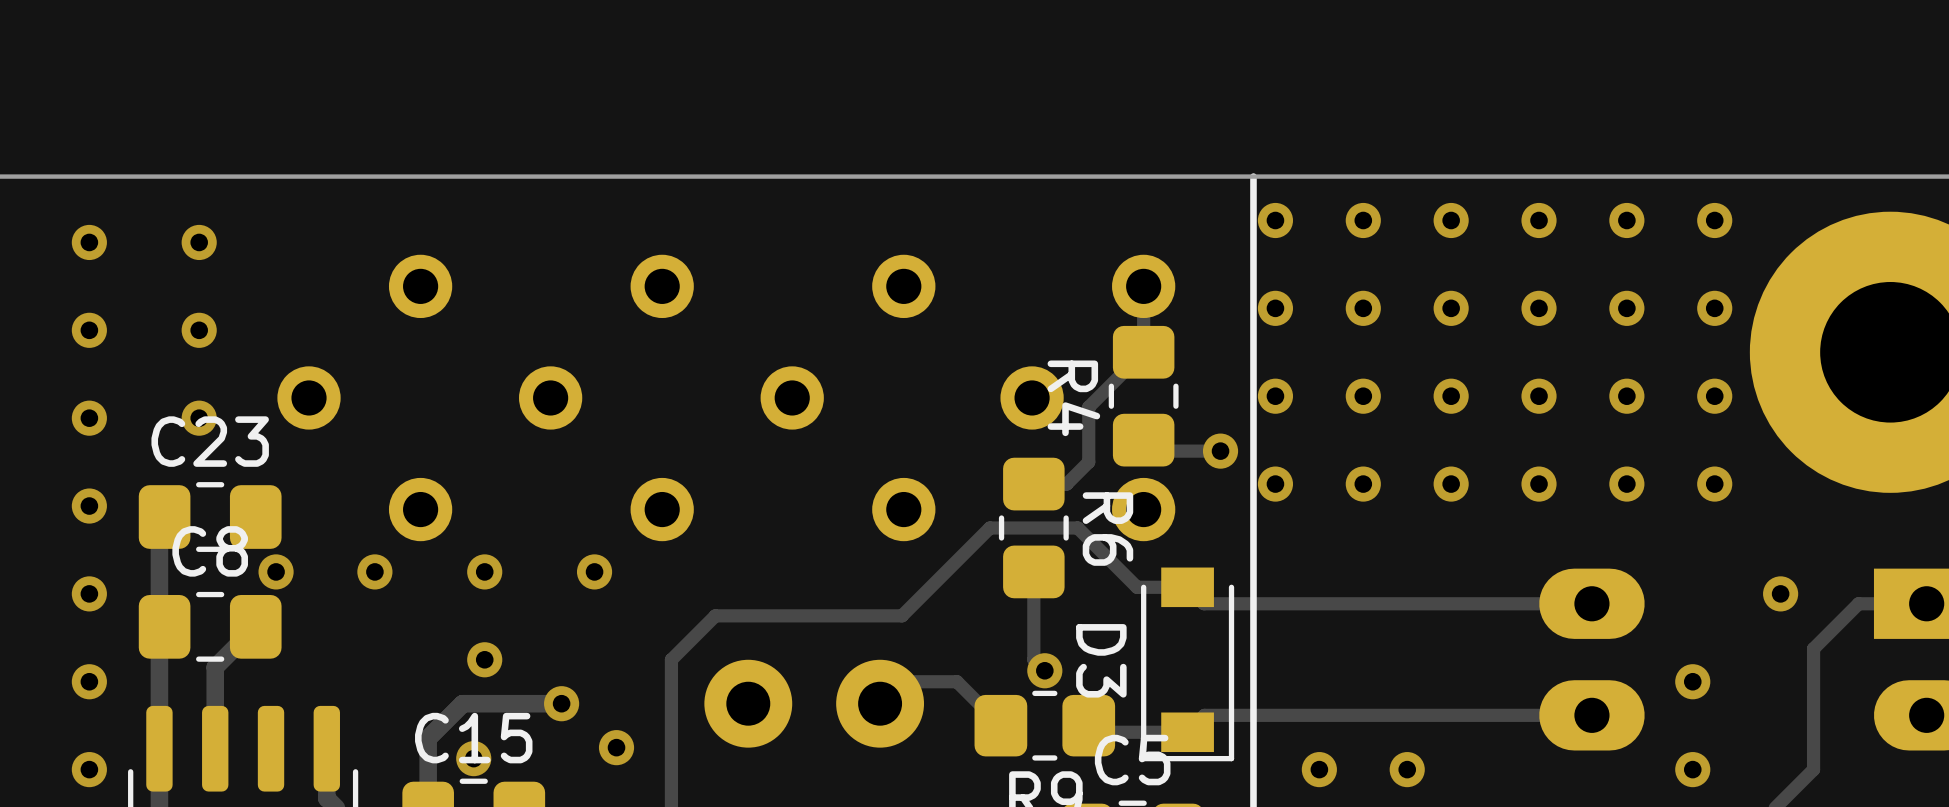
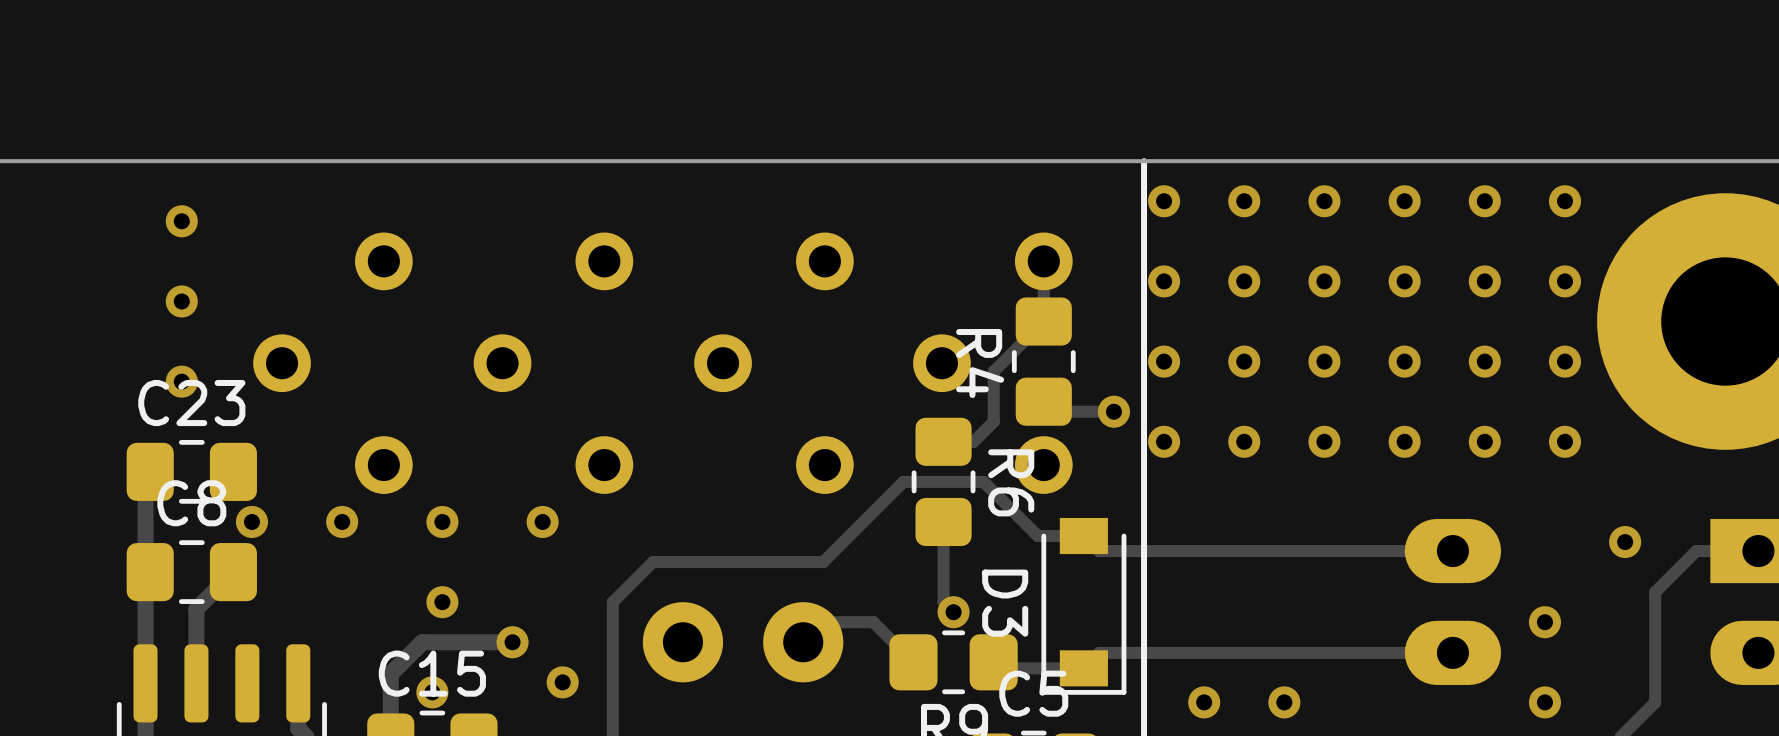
via: (89, 242) -> none
via: (89, 330) -> none
via: (89, 418) -> none
via: (89, 506) -> none
via: (89, 593) -> none
via: (89, 681) -> none
via: (89, 769) -> none

